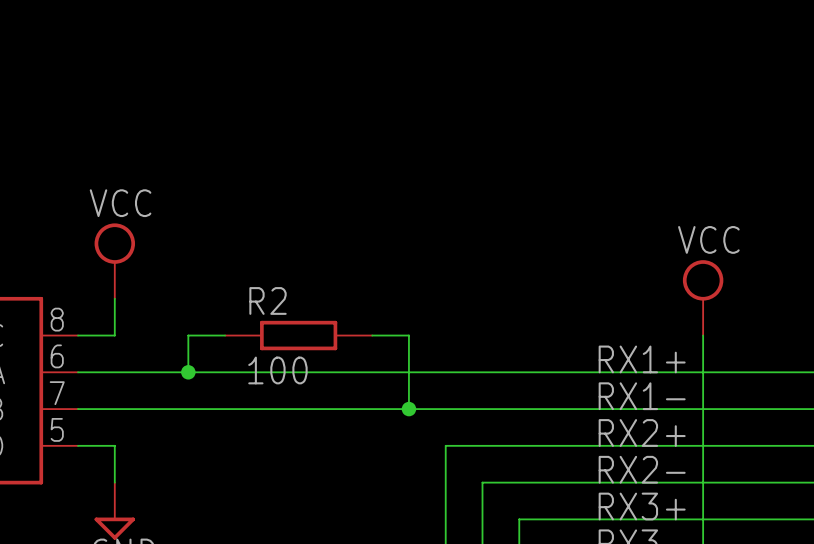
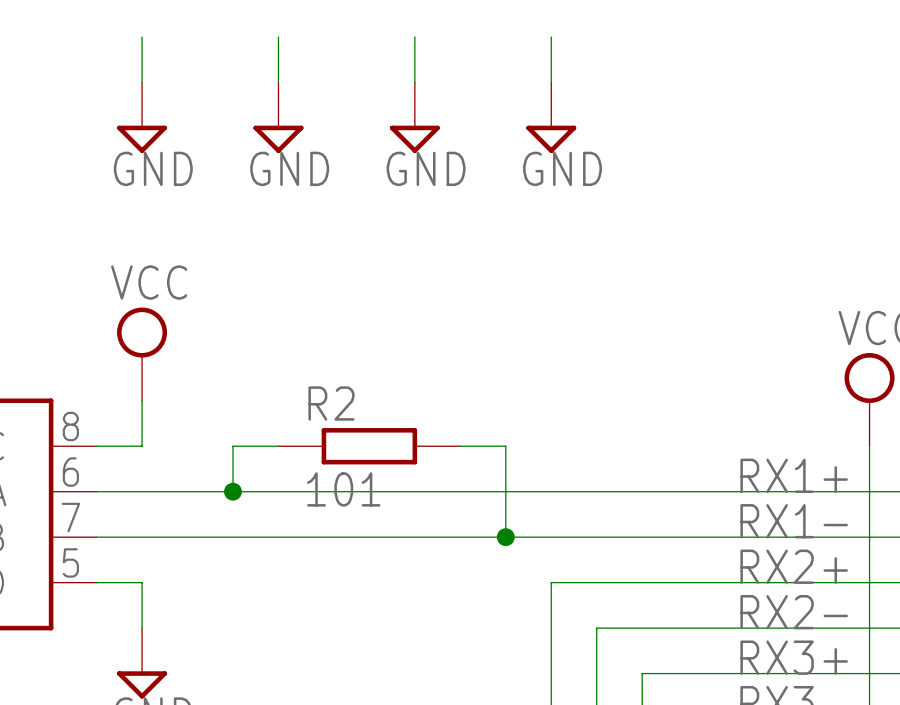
wire: none -> (142, 37) (142, 82)
wire: none -> (278, 37) (278, 82)
wire: none -> (414, 37) (414, 82)
wire: none -> (551, 37) (551, 82)
power symbol: none -> GND (142, 117)
power symbol: none -> GND (278, 117)
power symbol: none -> GND (414, 117)
power symbol: none -> GND (551, 117)
R2 value: 100 (277, 370) -> 101 (343, 489)

